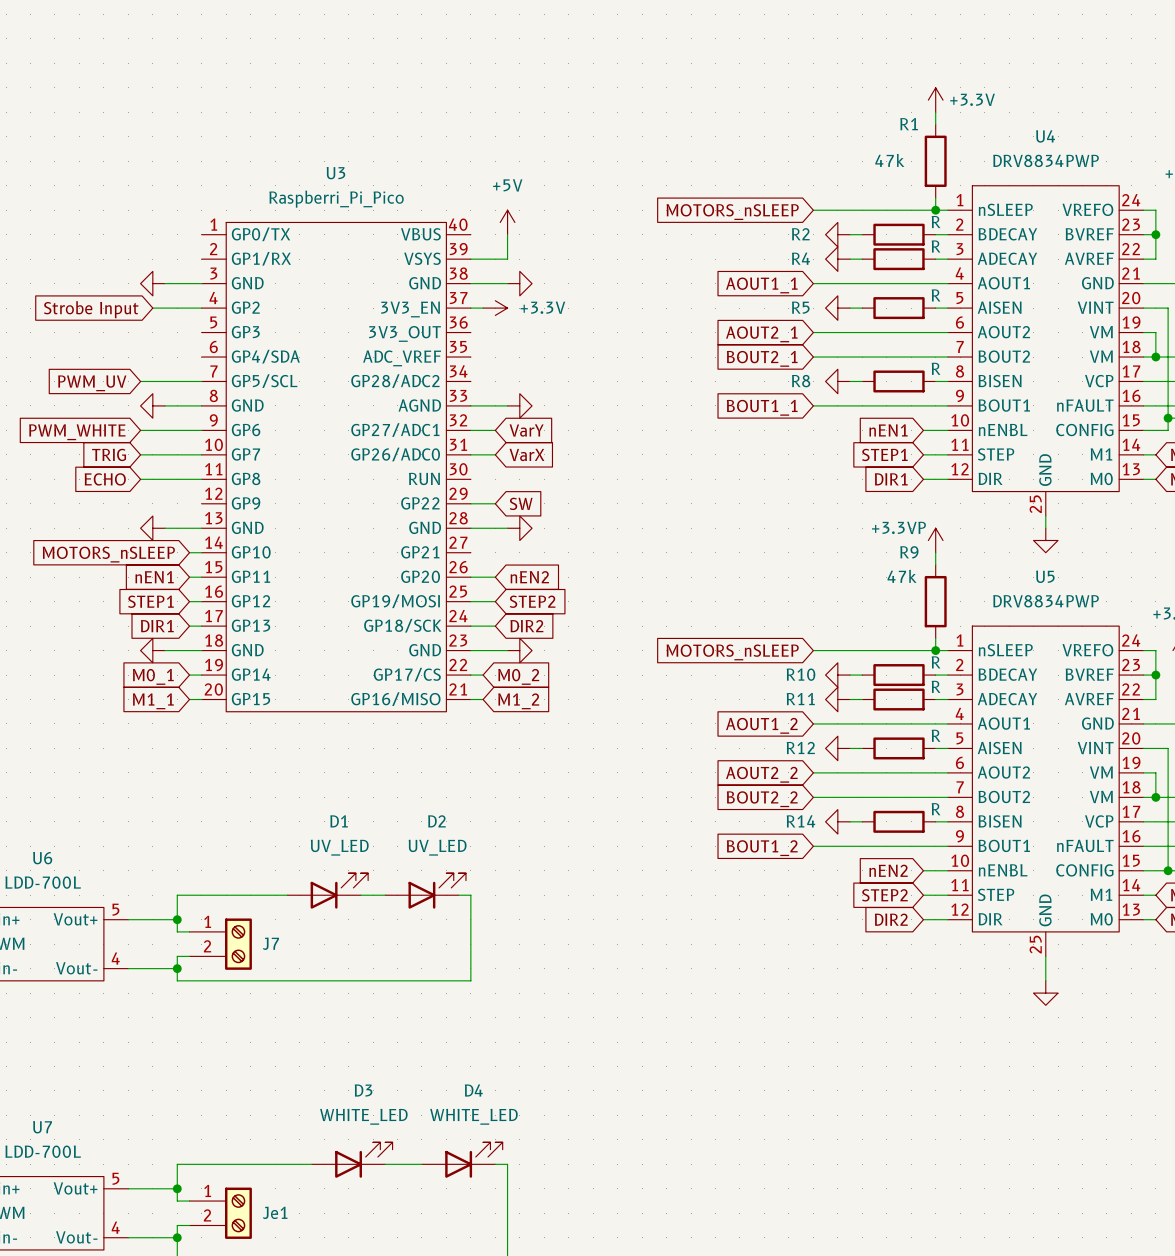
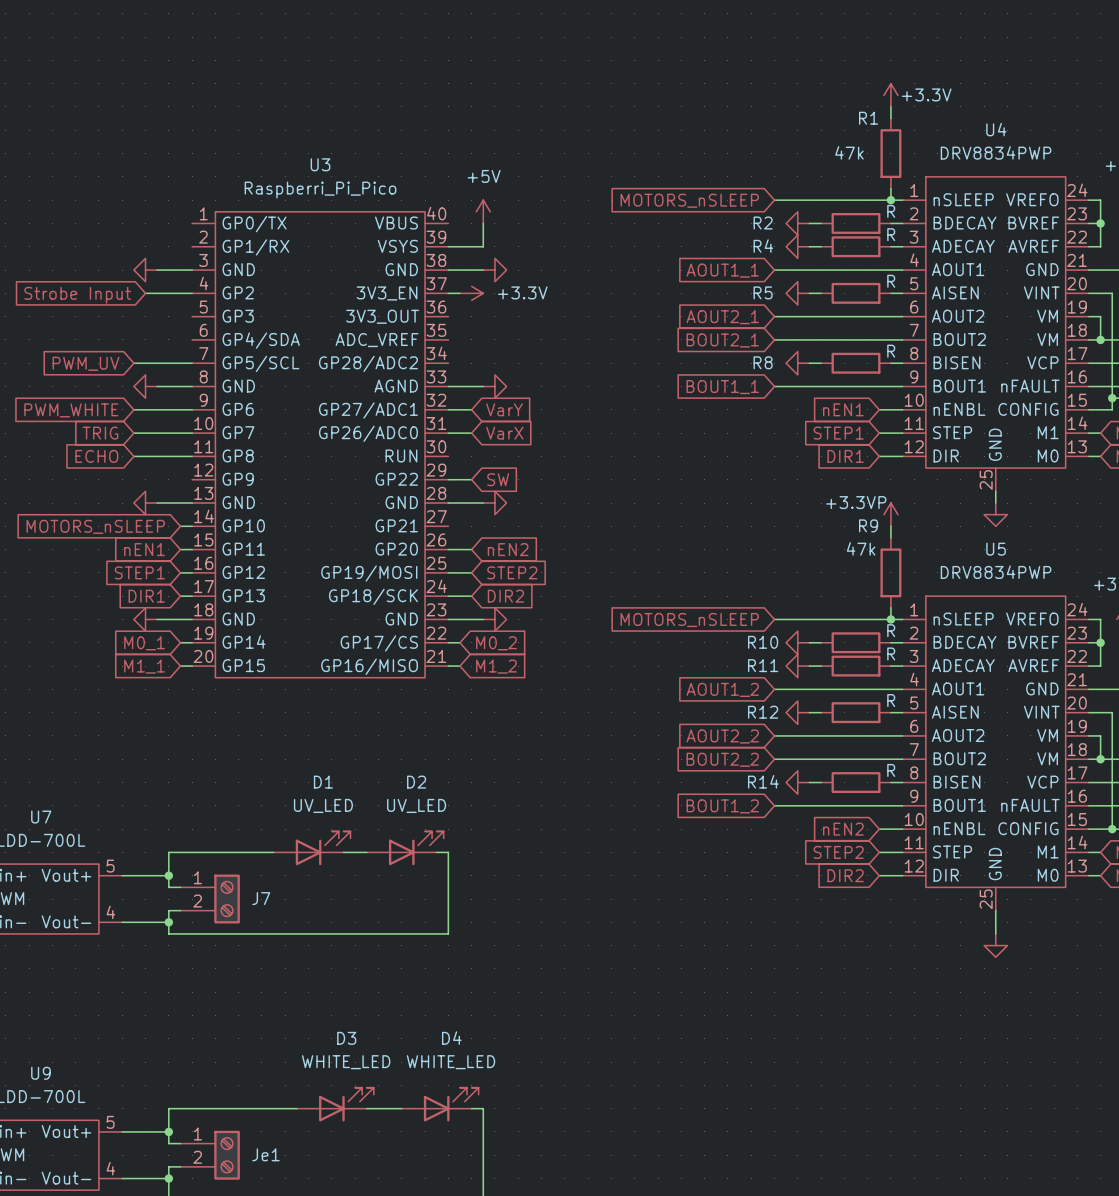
U6 name: U6 (42, 858) -> U7 (41, 817)
U7 name: U7 (42, 1127) -> U9 (40, 1073)

